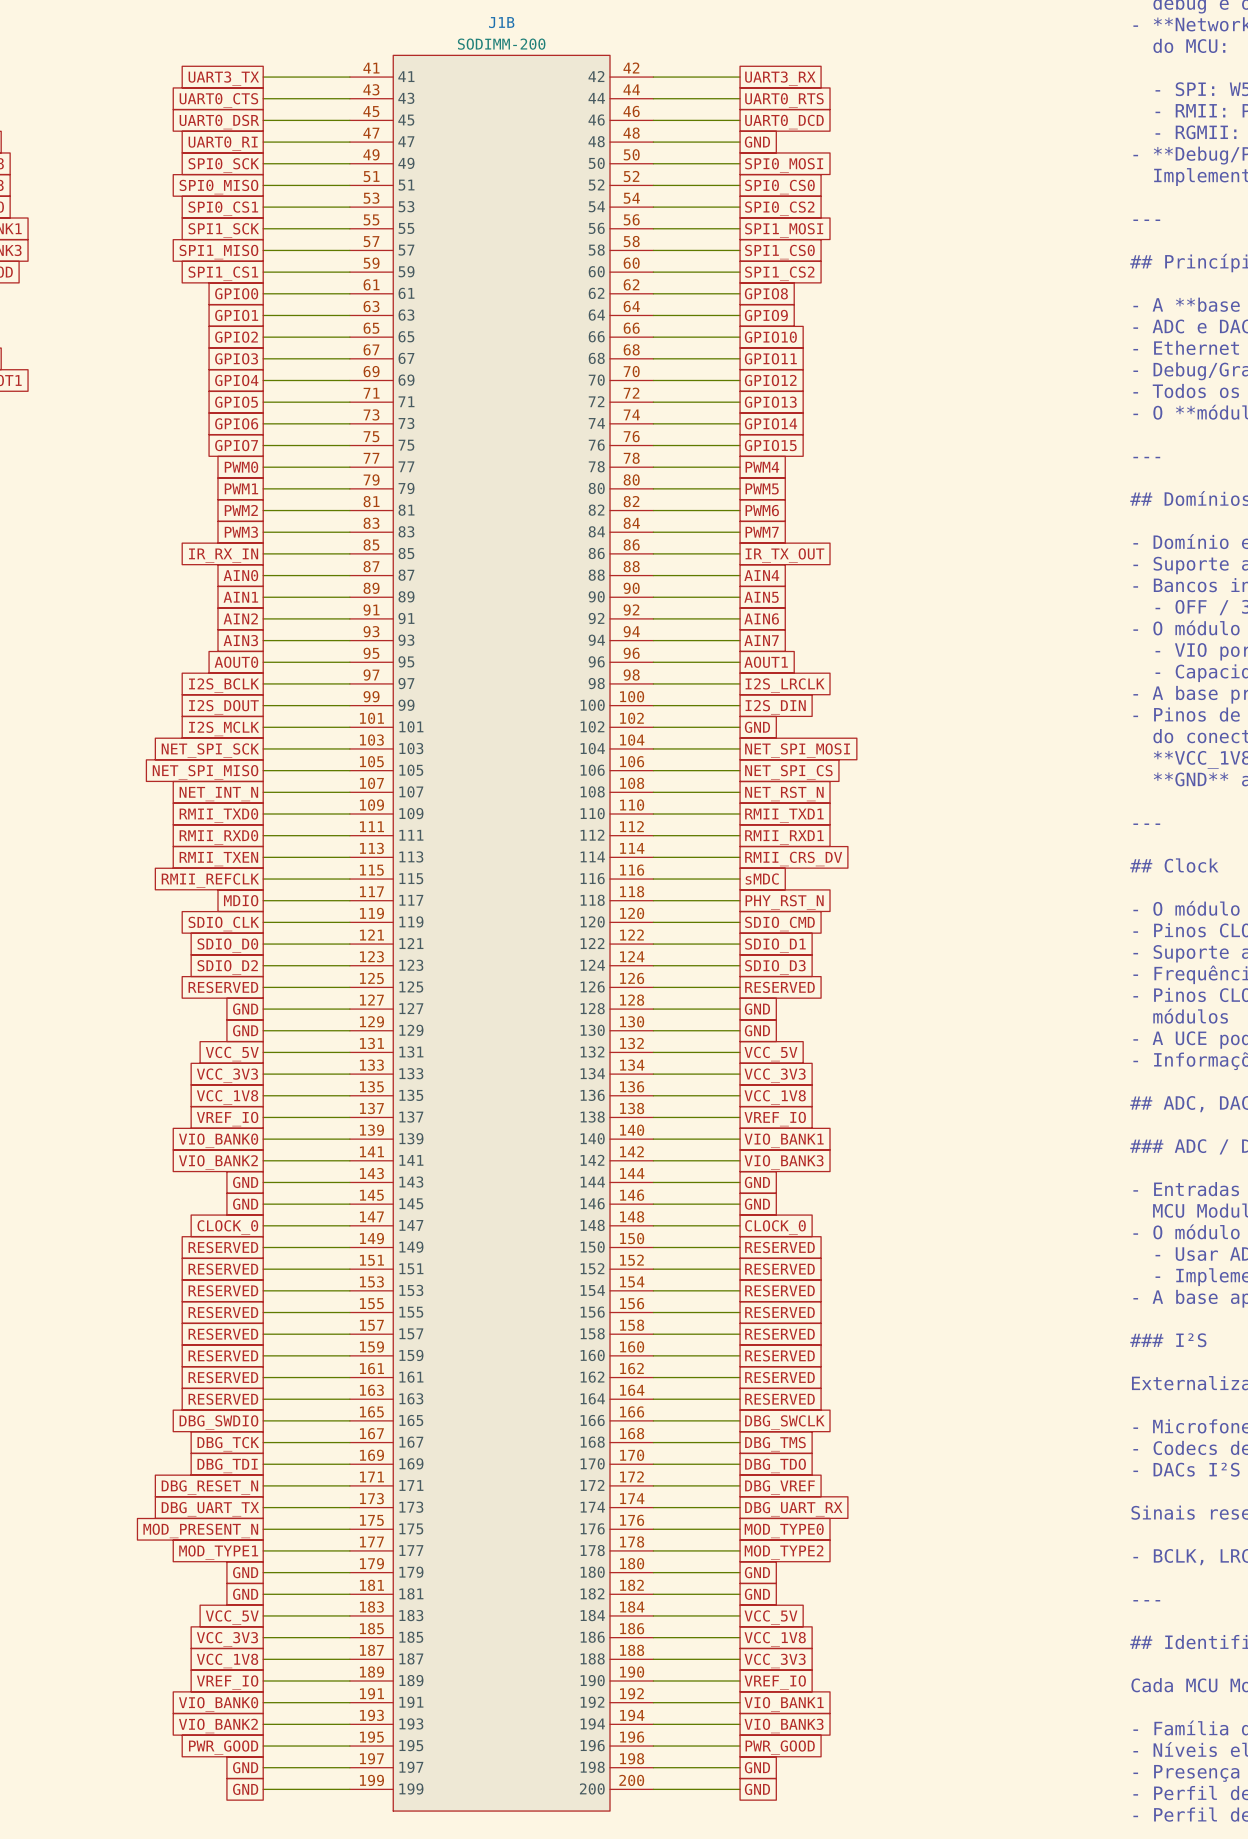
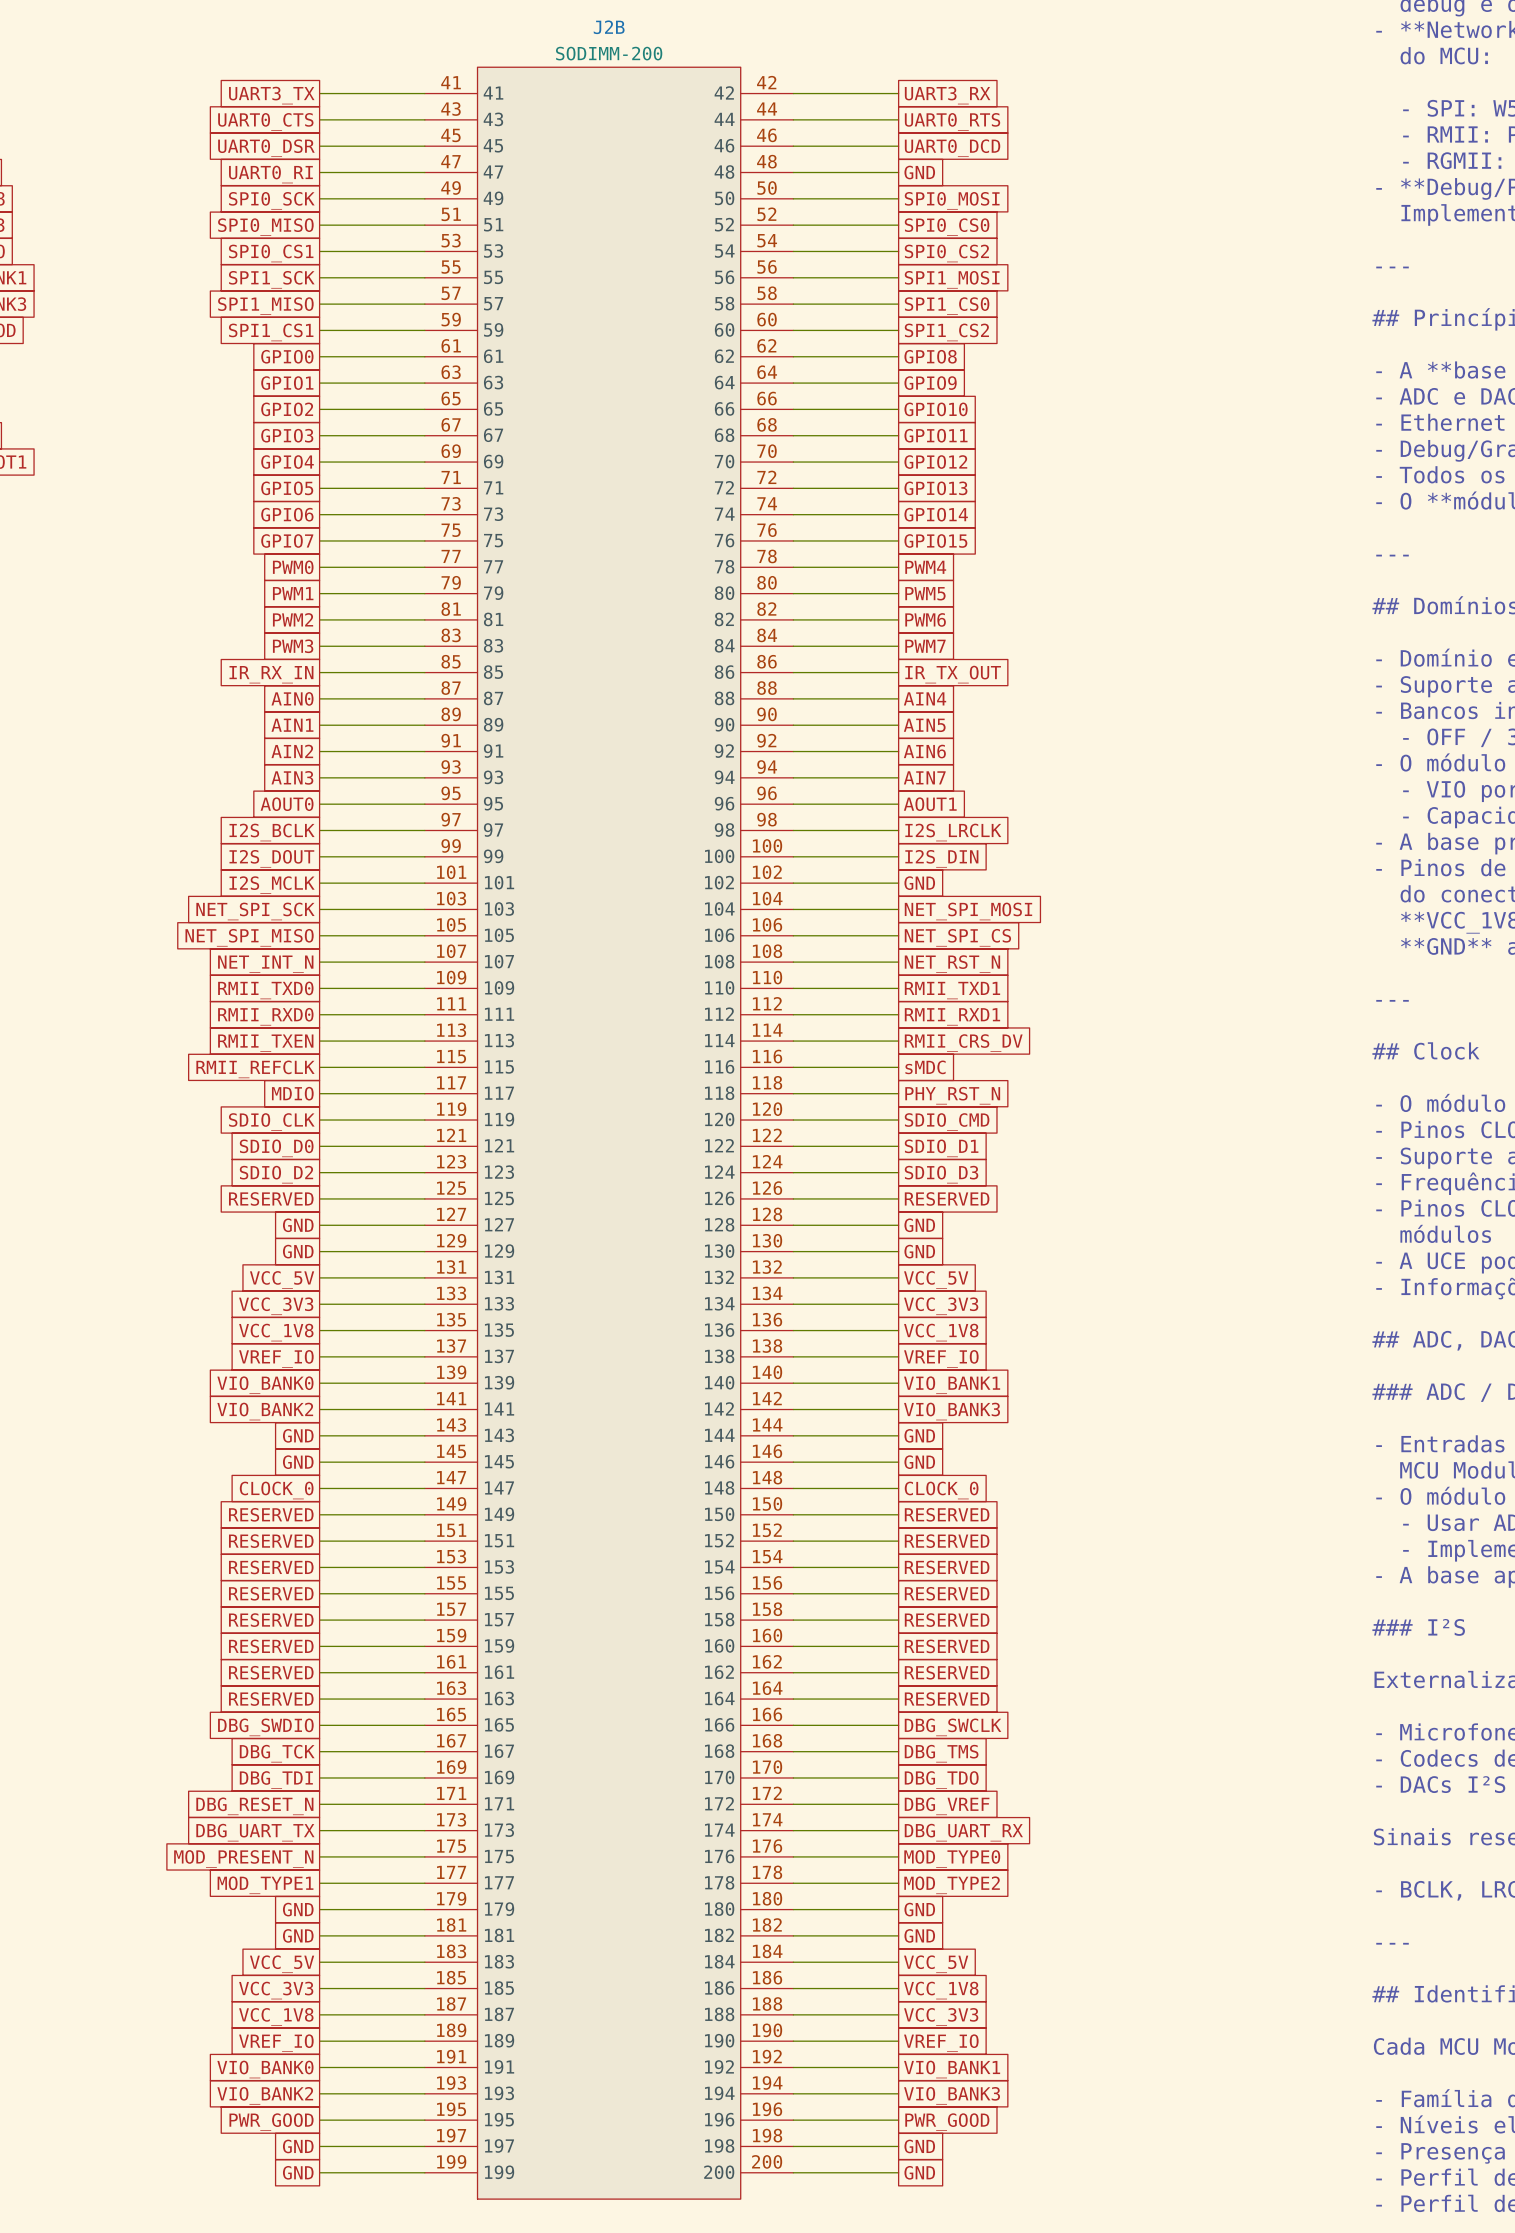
J1B name: J1B (501, 22) -> J2B (609, 27)

